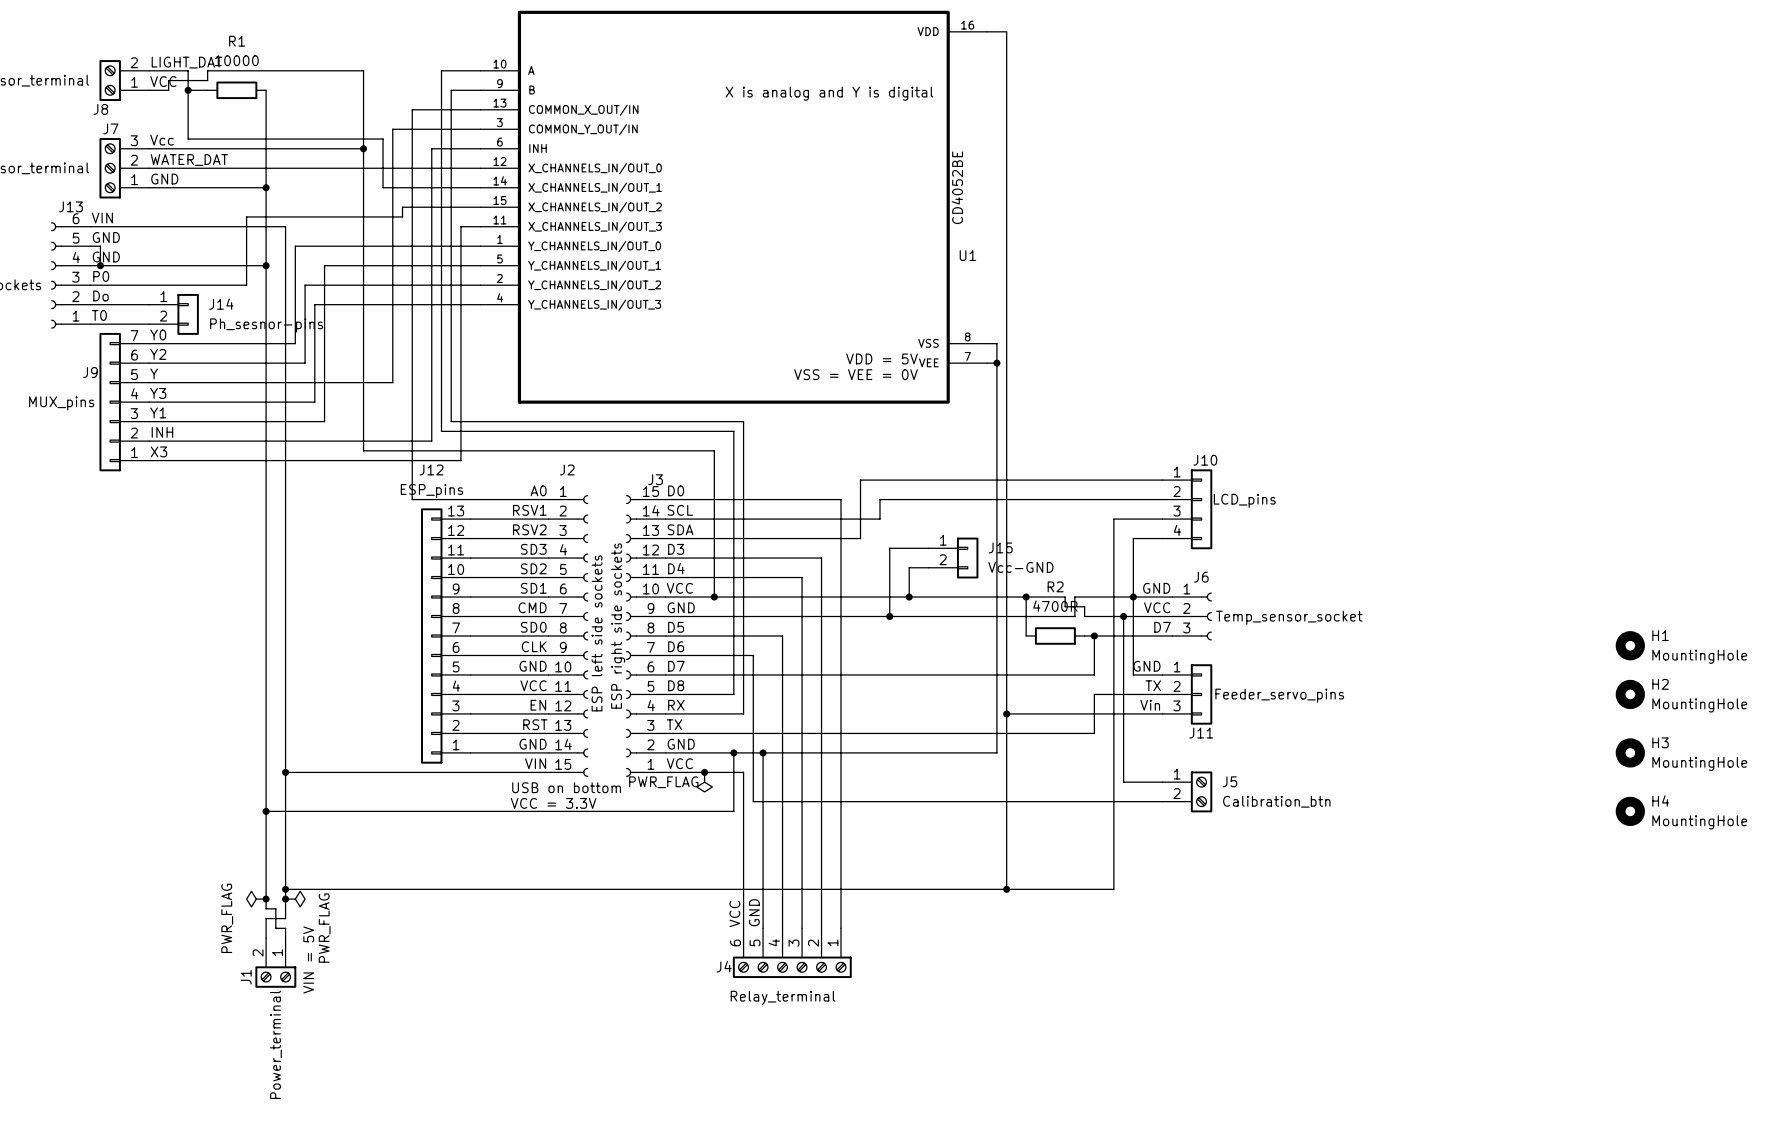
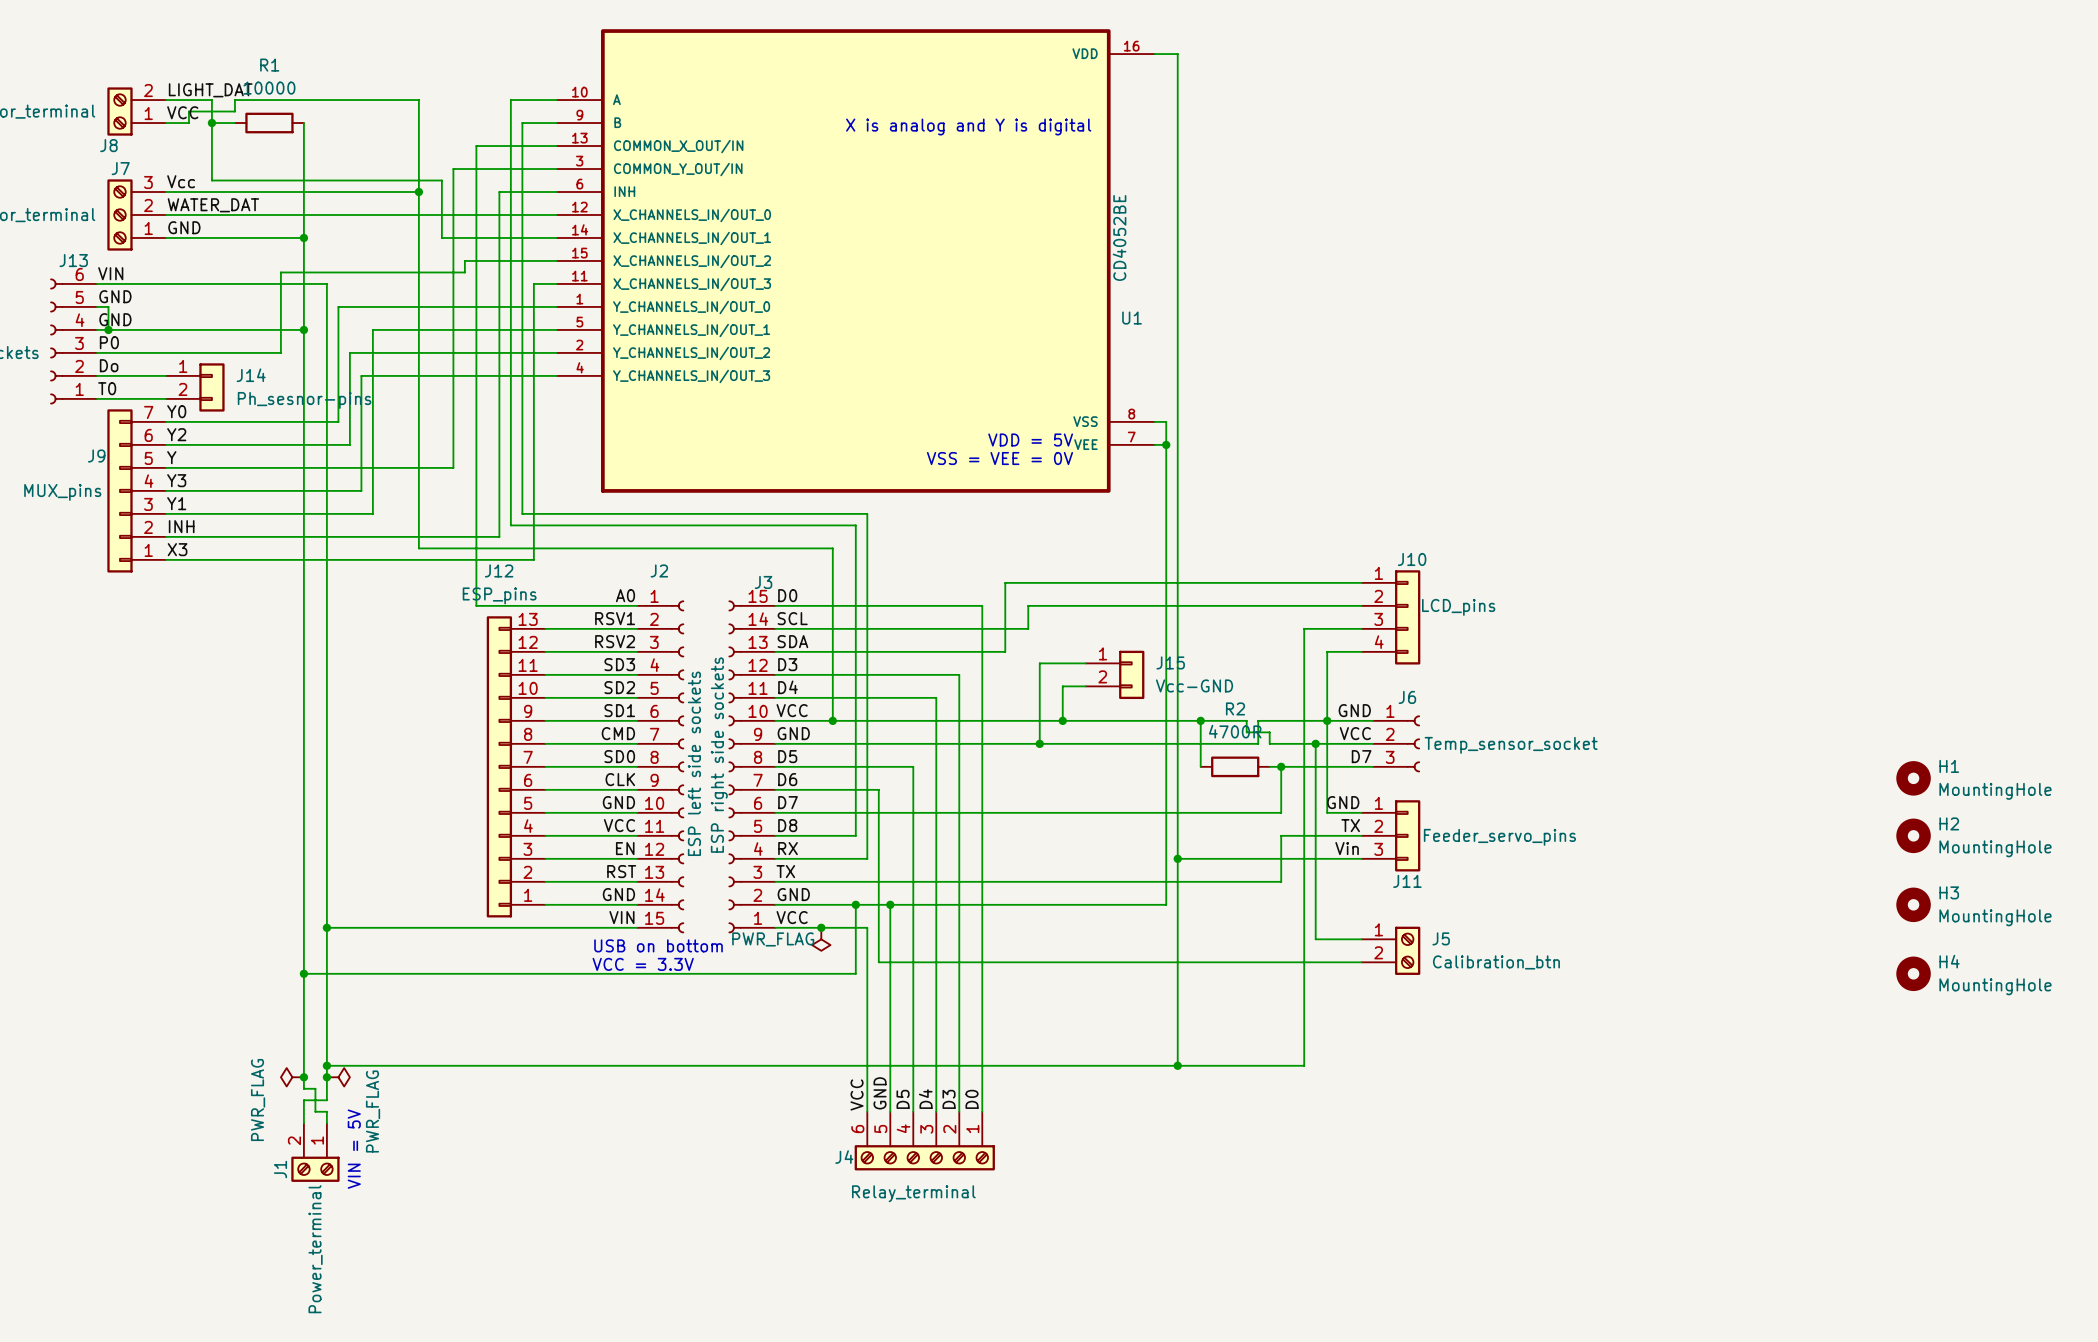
label: none -> D5 (903, 1099)
label: none -> D4 (925, 1099)
label: none -> D3 (949, 1099)
label: none -> D0 (972, 1099)

